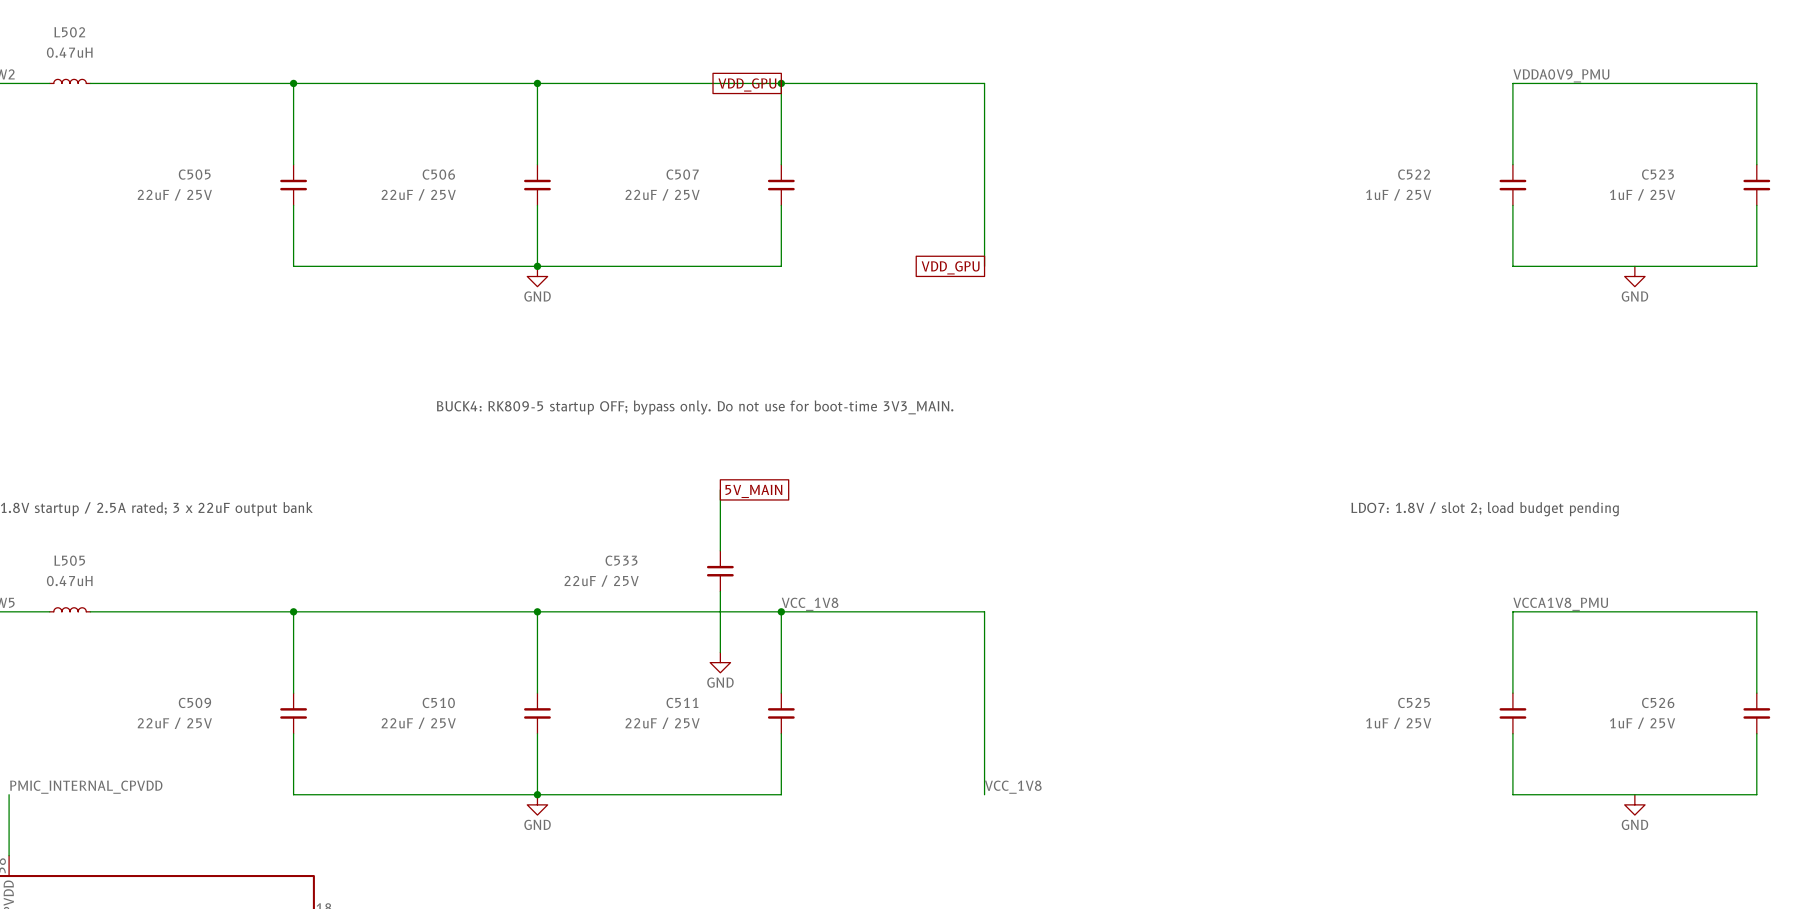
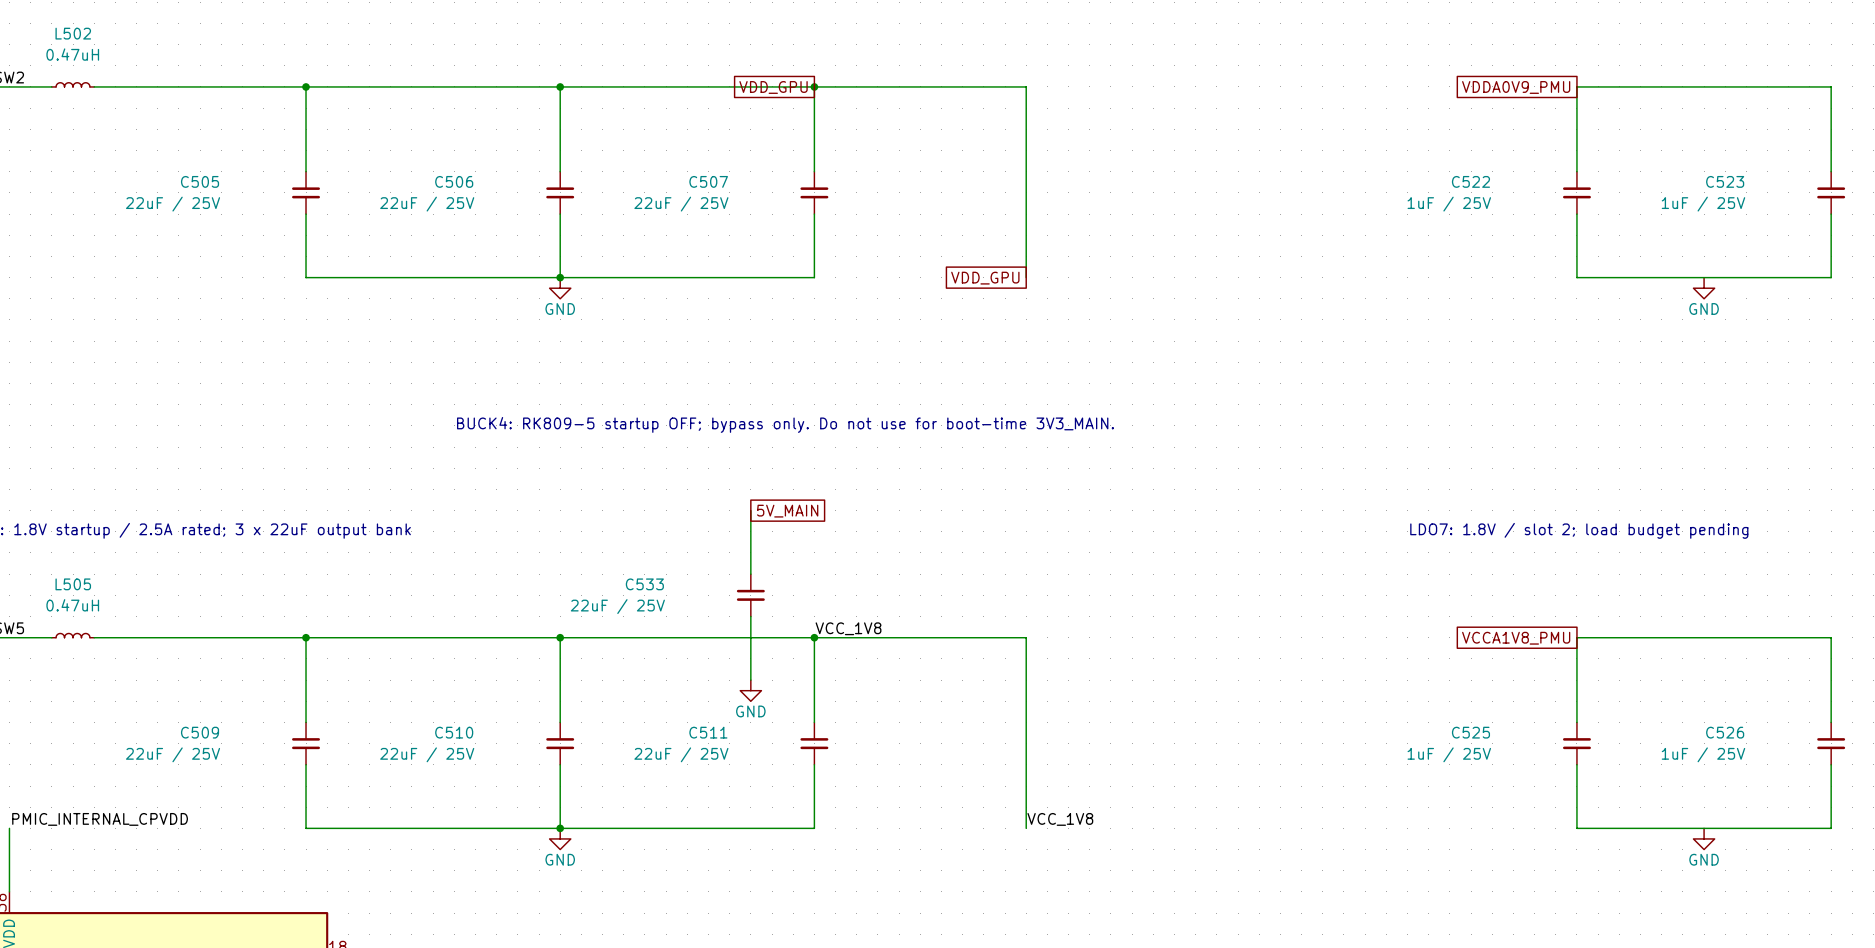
label: VDDA0V9_PMU (1561, 75) -> none
global label: none -> VDDA0V9_PMU (1516, 87)
label: VCCA1V8_PMU (1560, 604) -> none
global label: none -> VCCA1V8_PMU (1516, 638)

